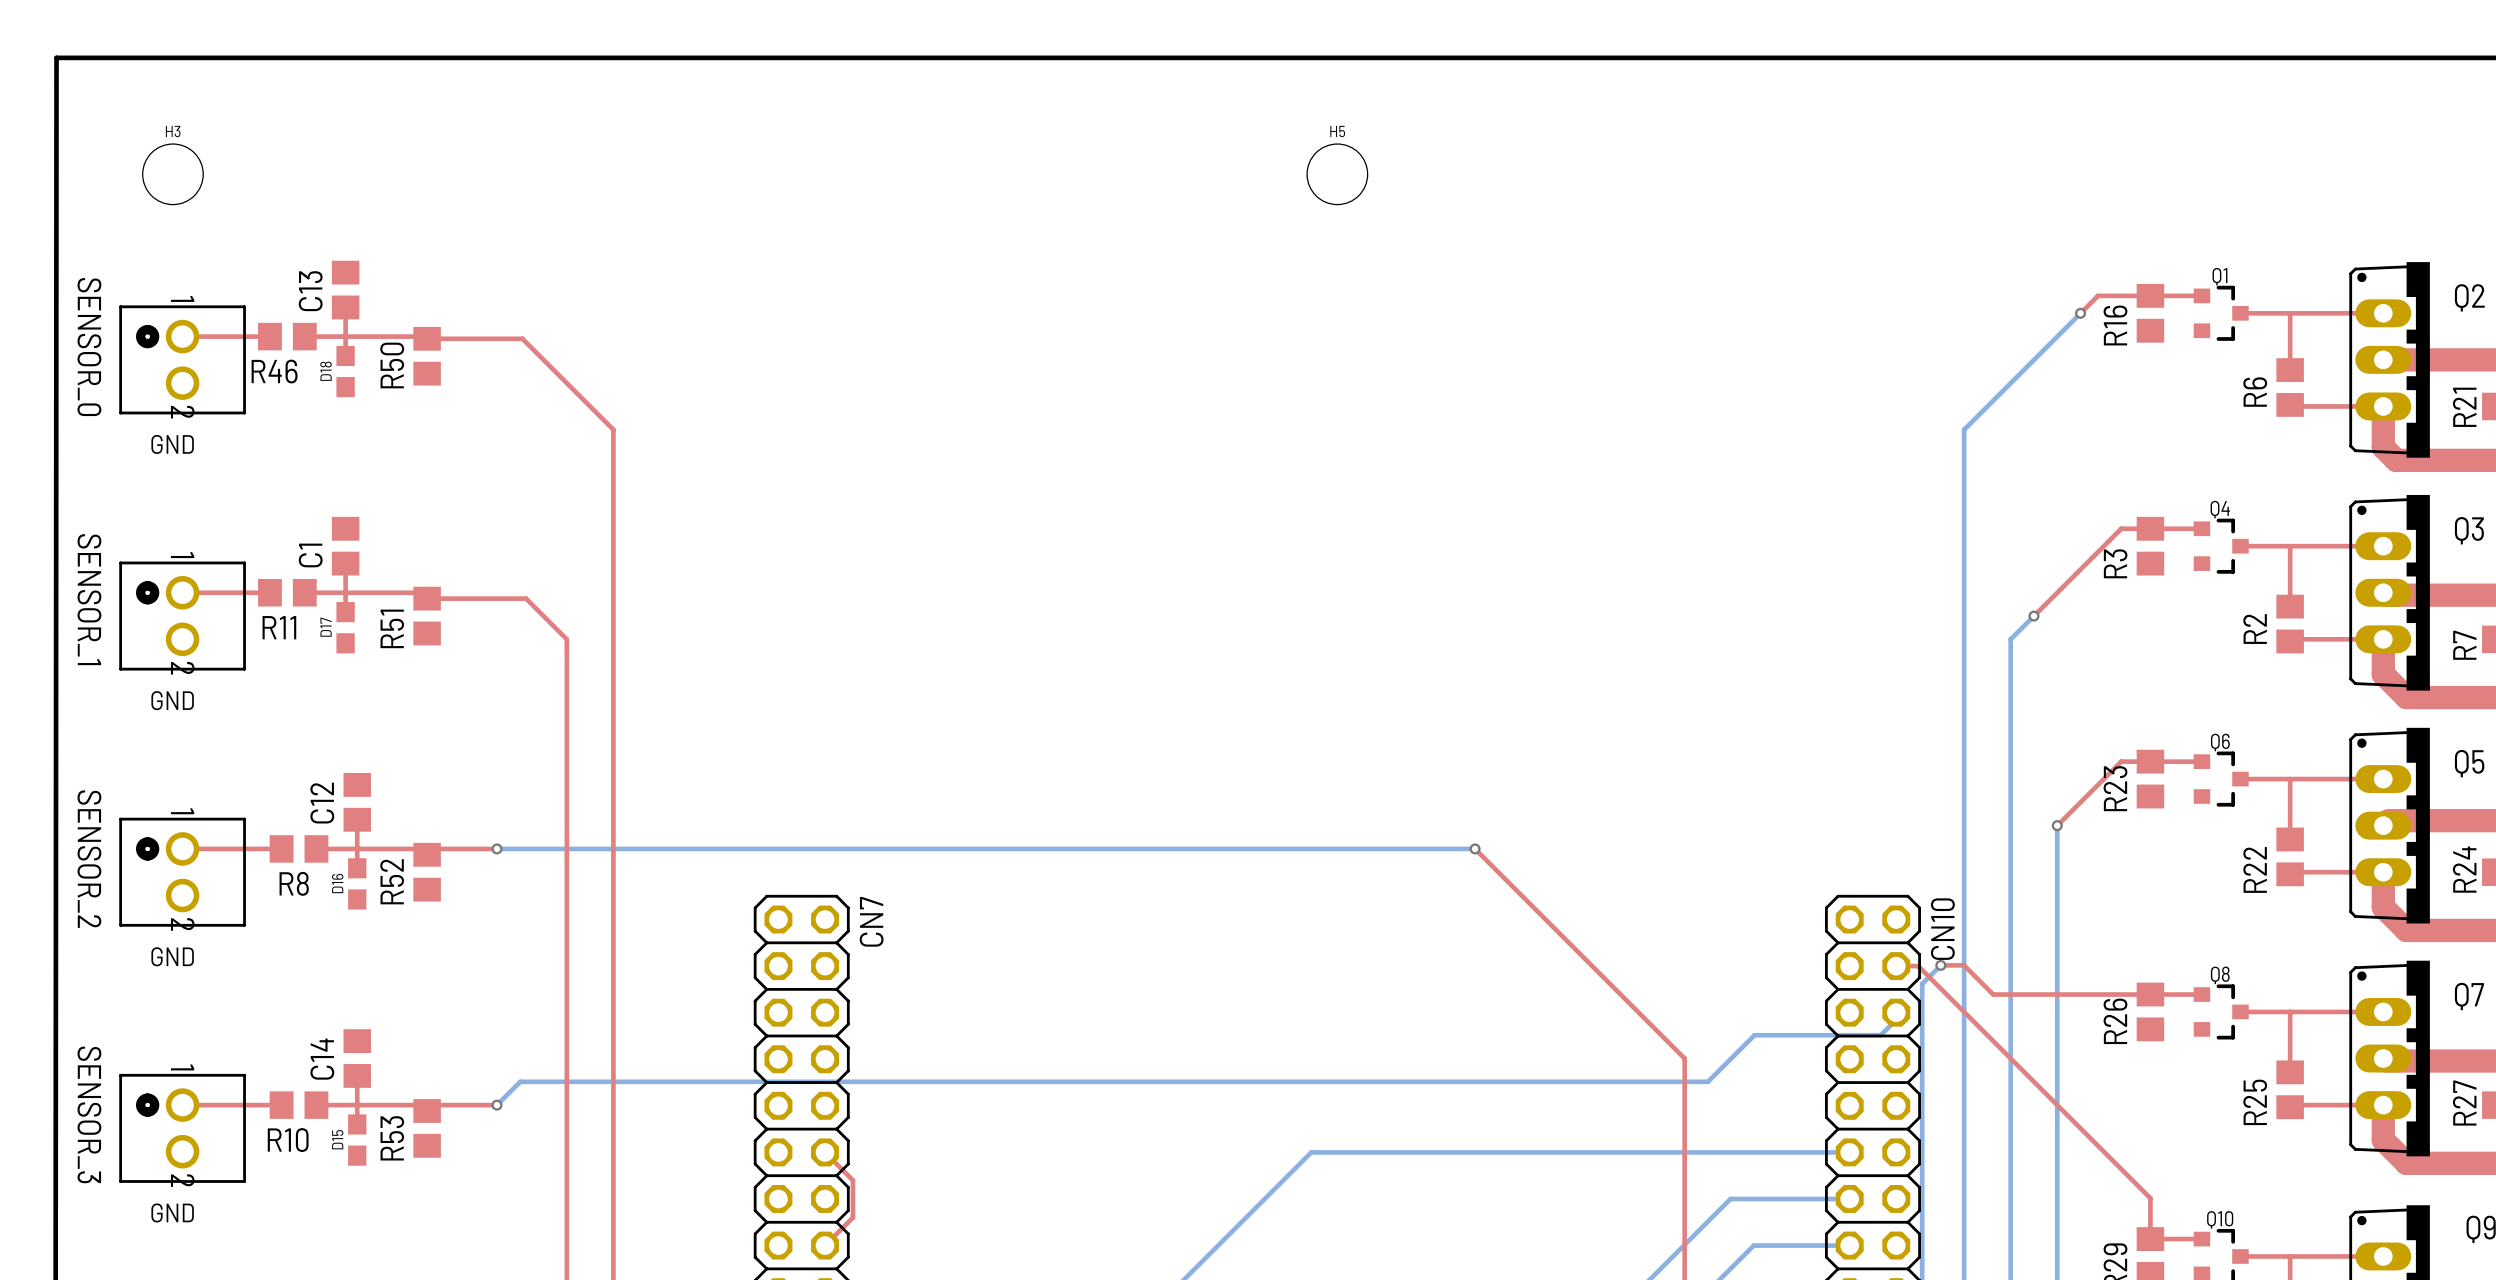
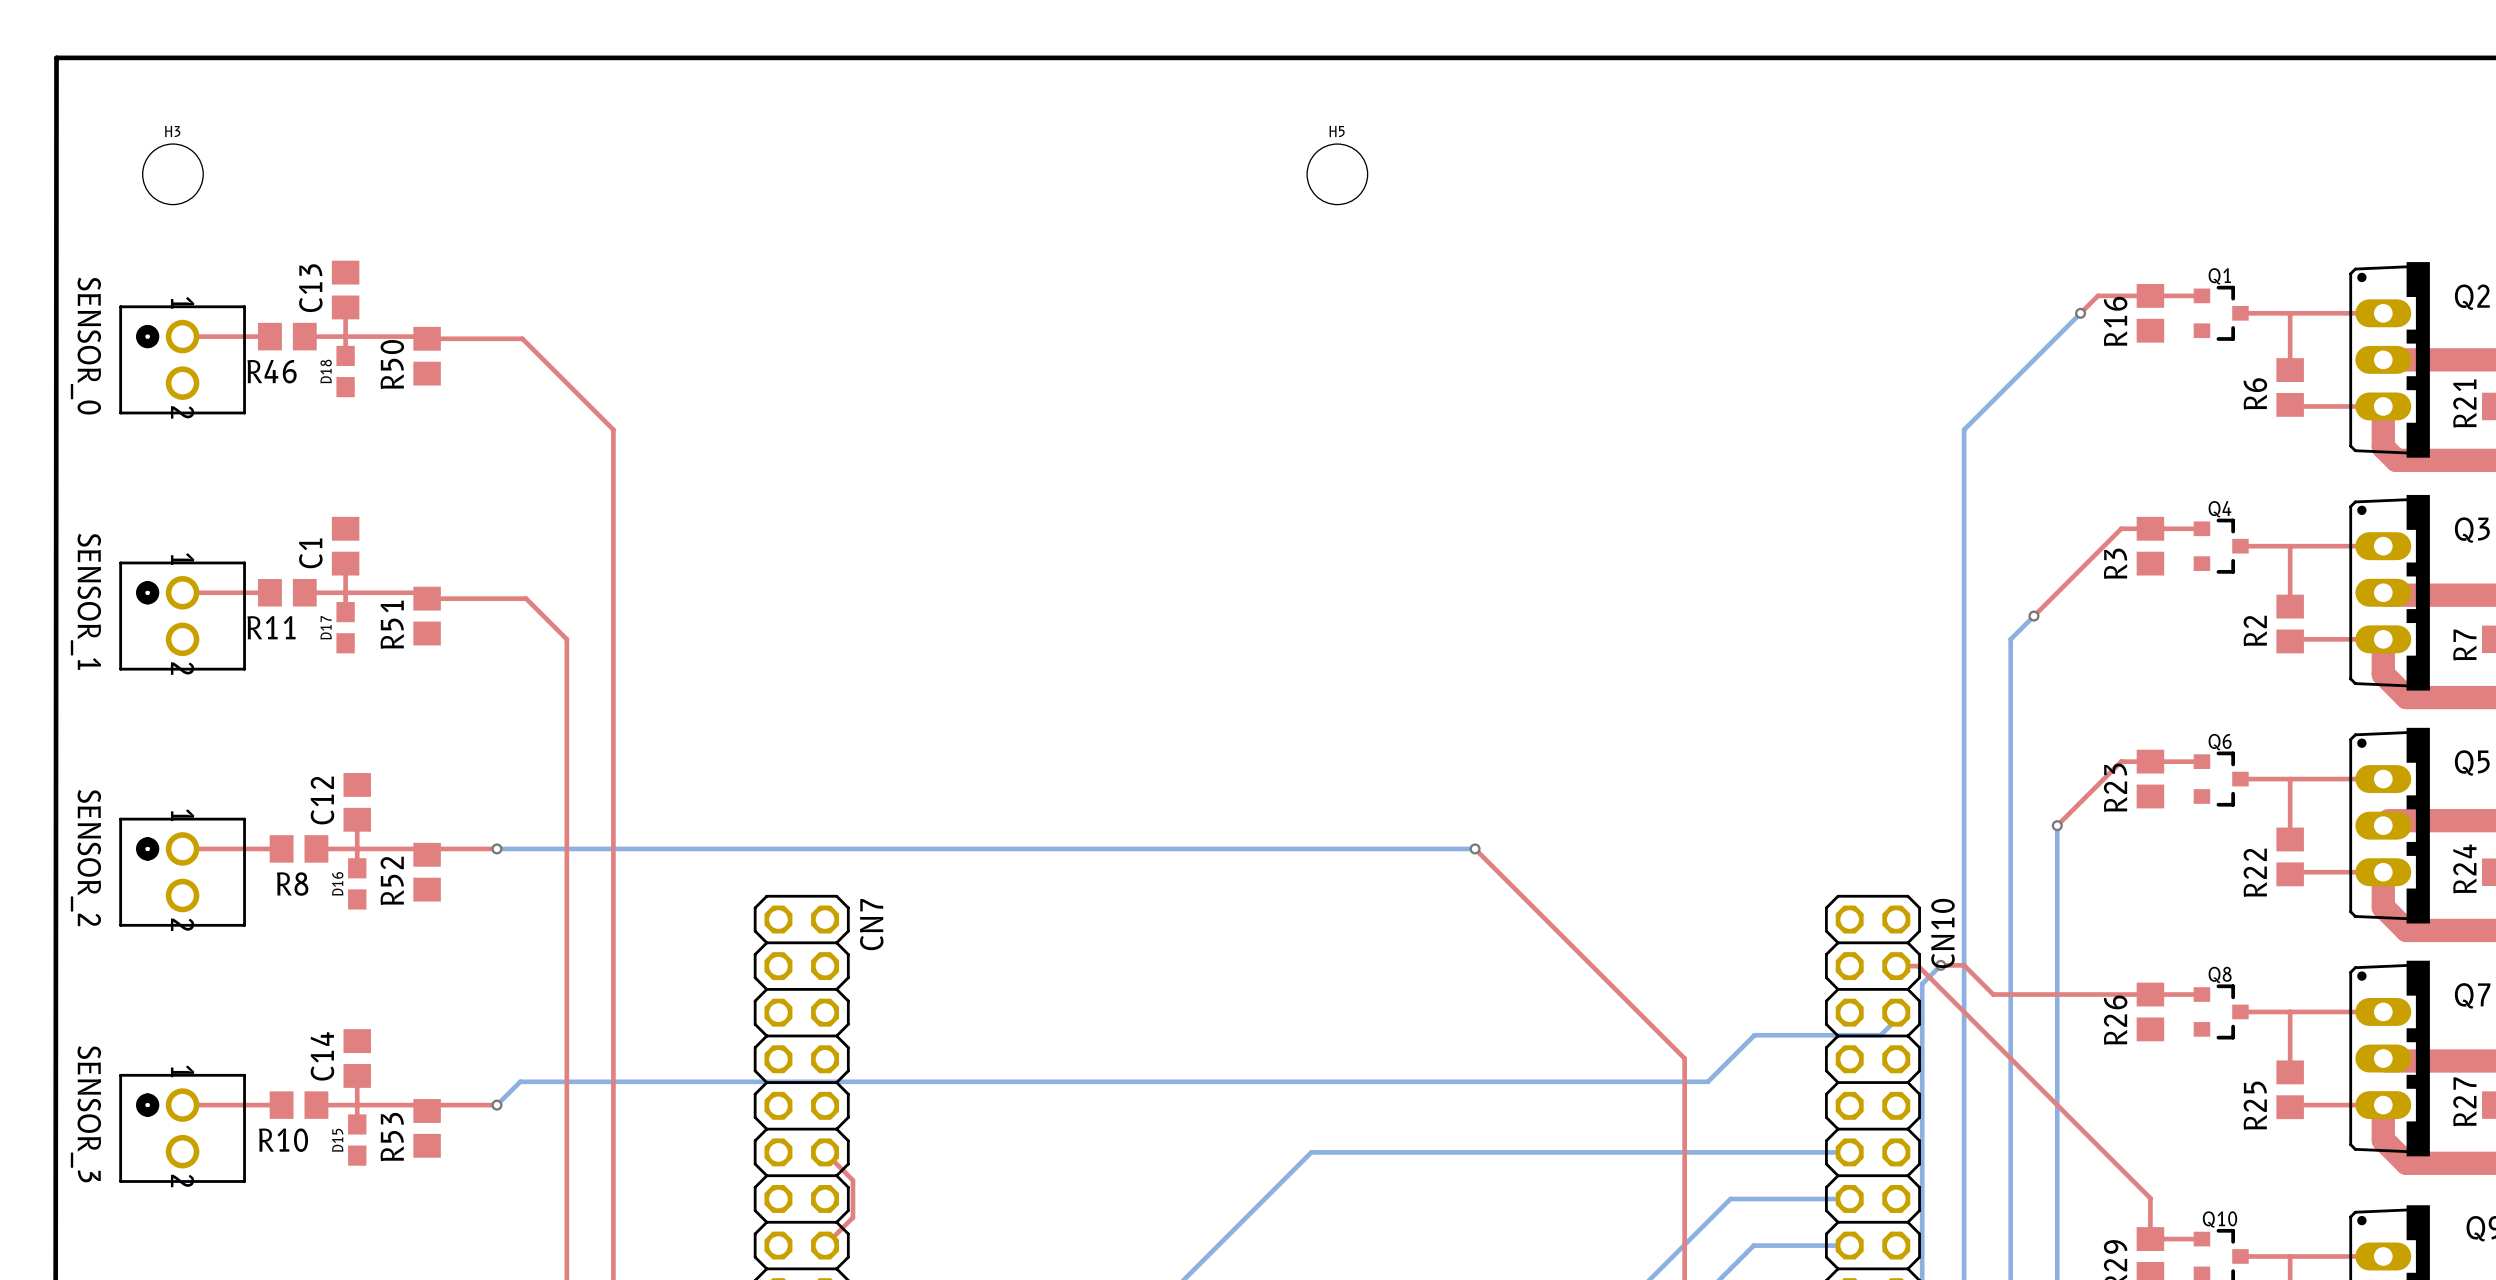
text: GND (172, 444) -> none
text: GND (172, 700) -> none
text: GND (172, 956) -> none
text: GND (172, 1212) -> none

